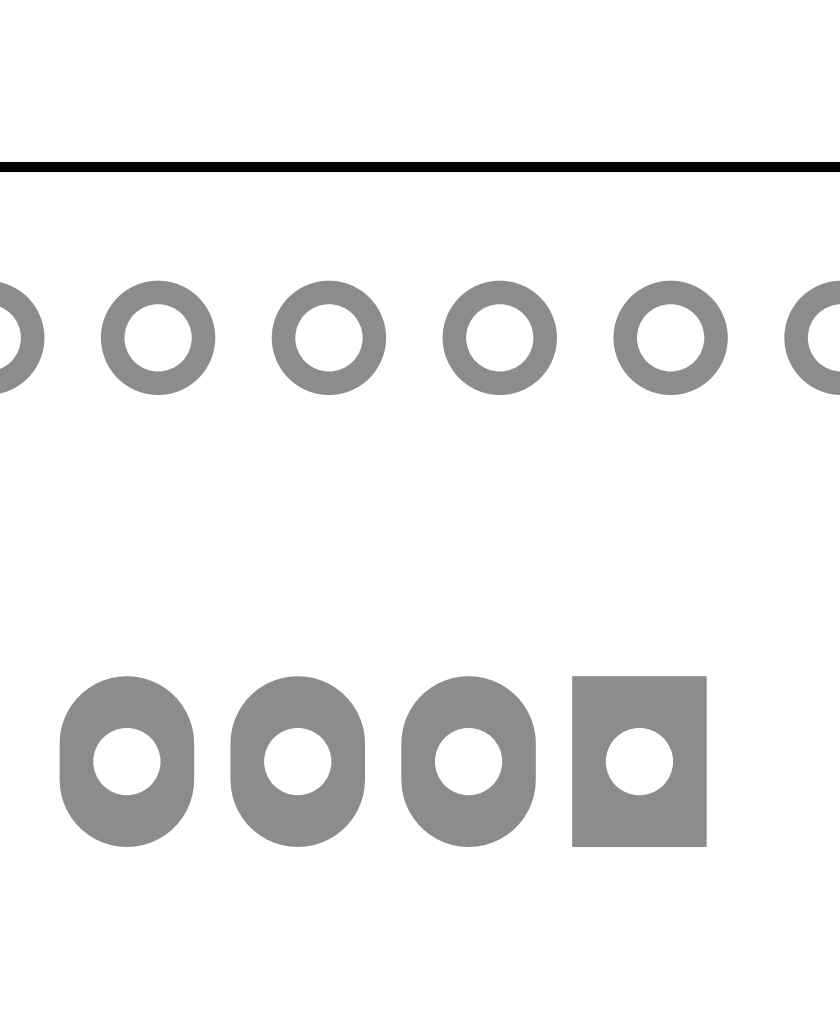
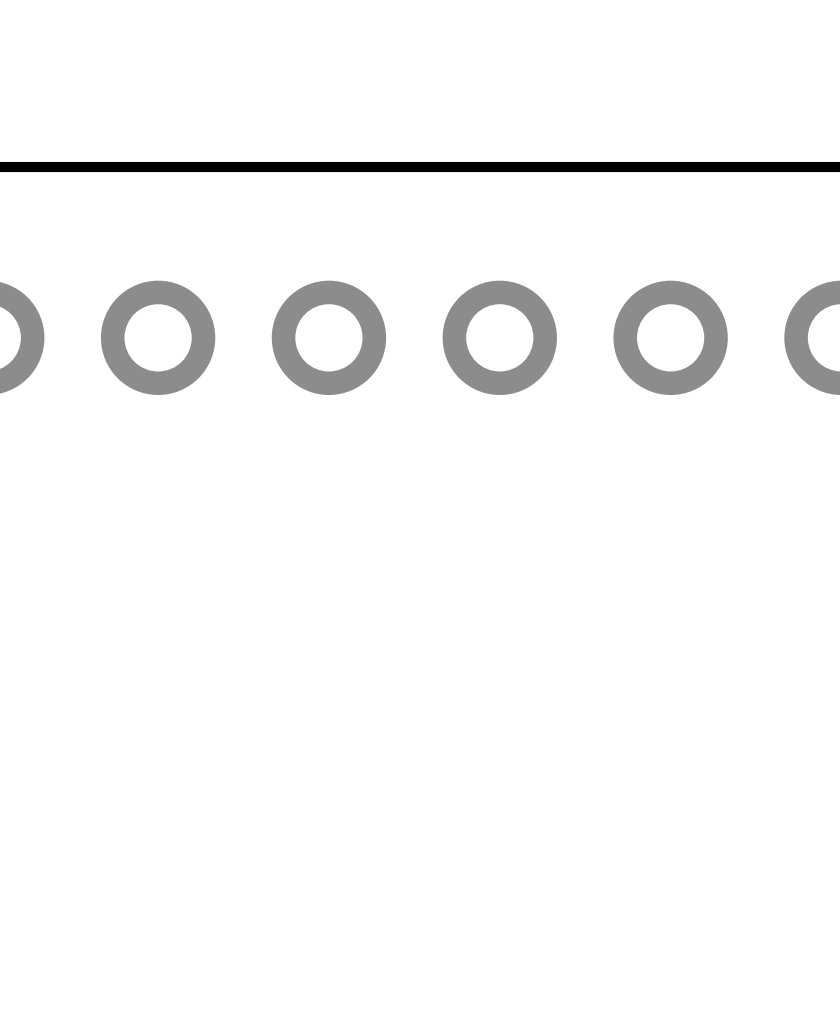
part: (383, 761) -> none

